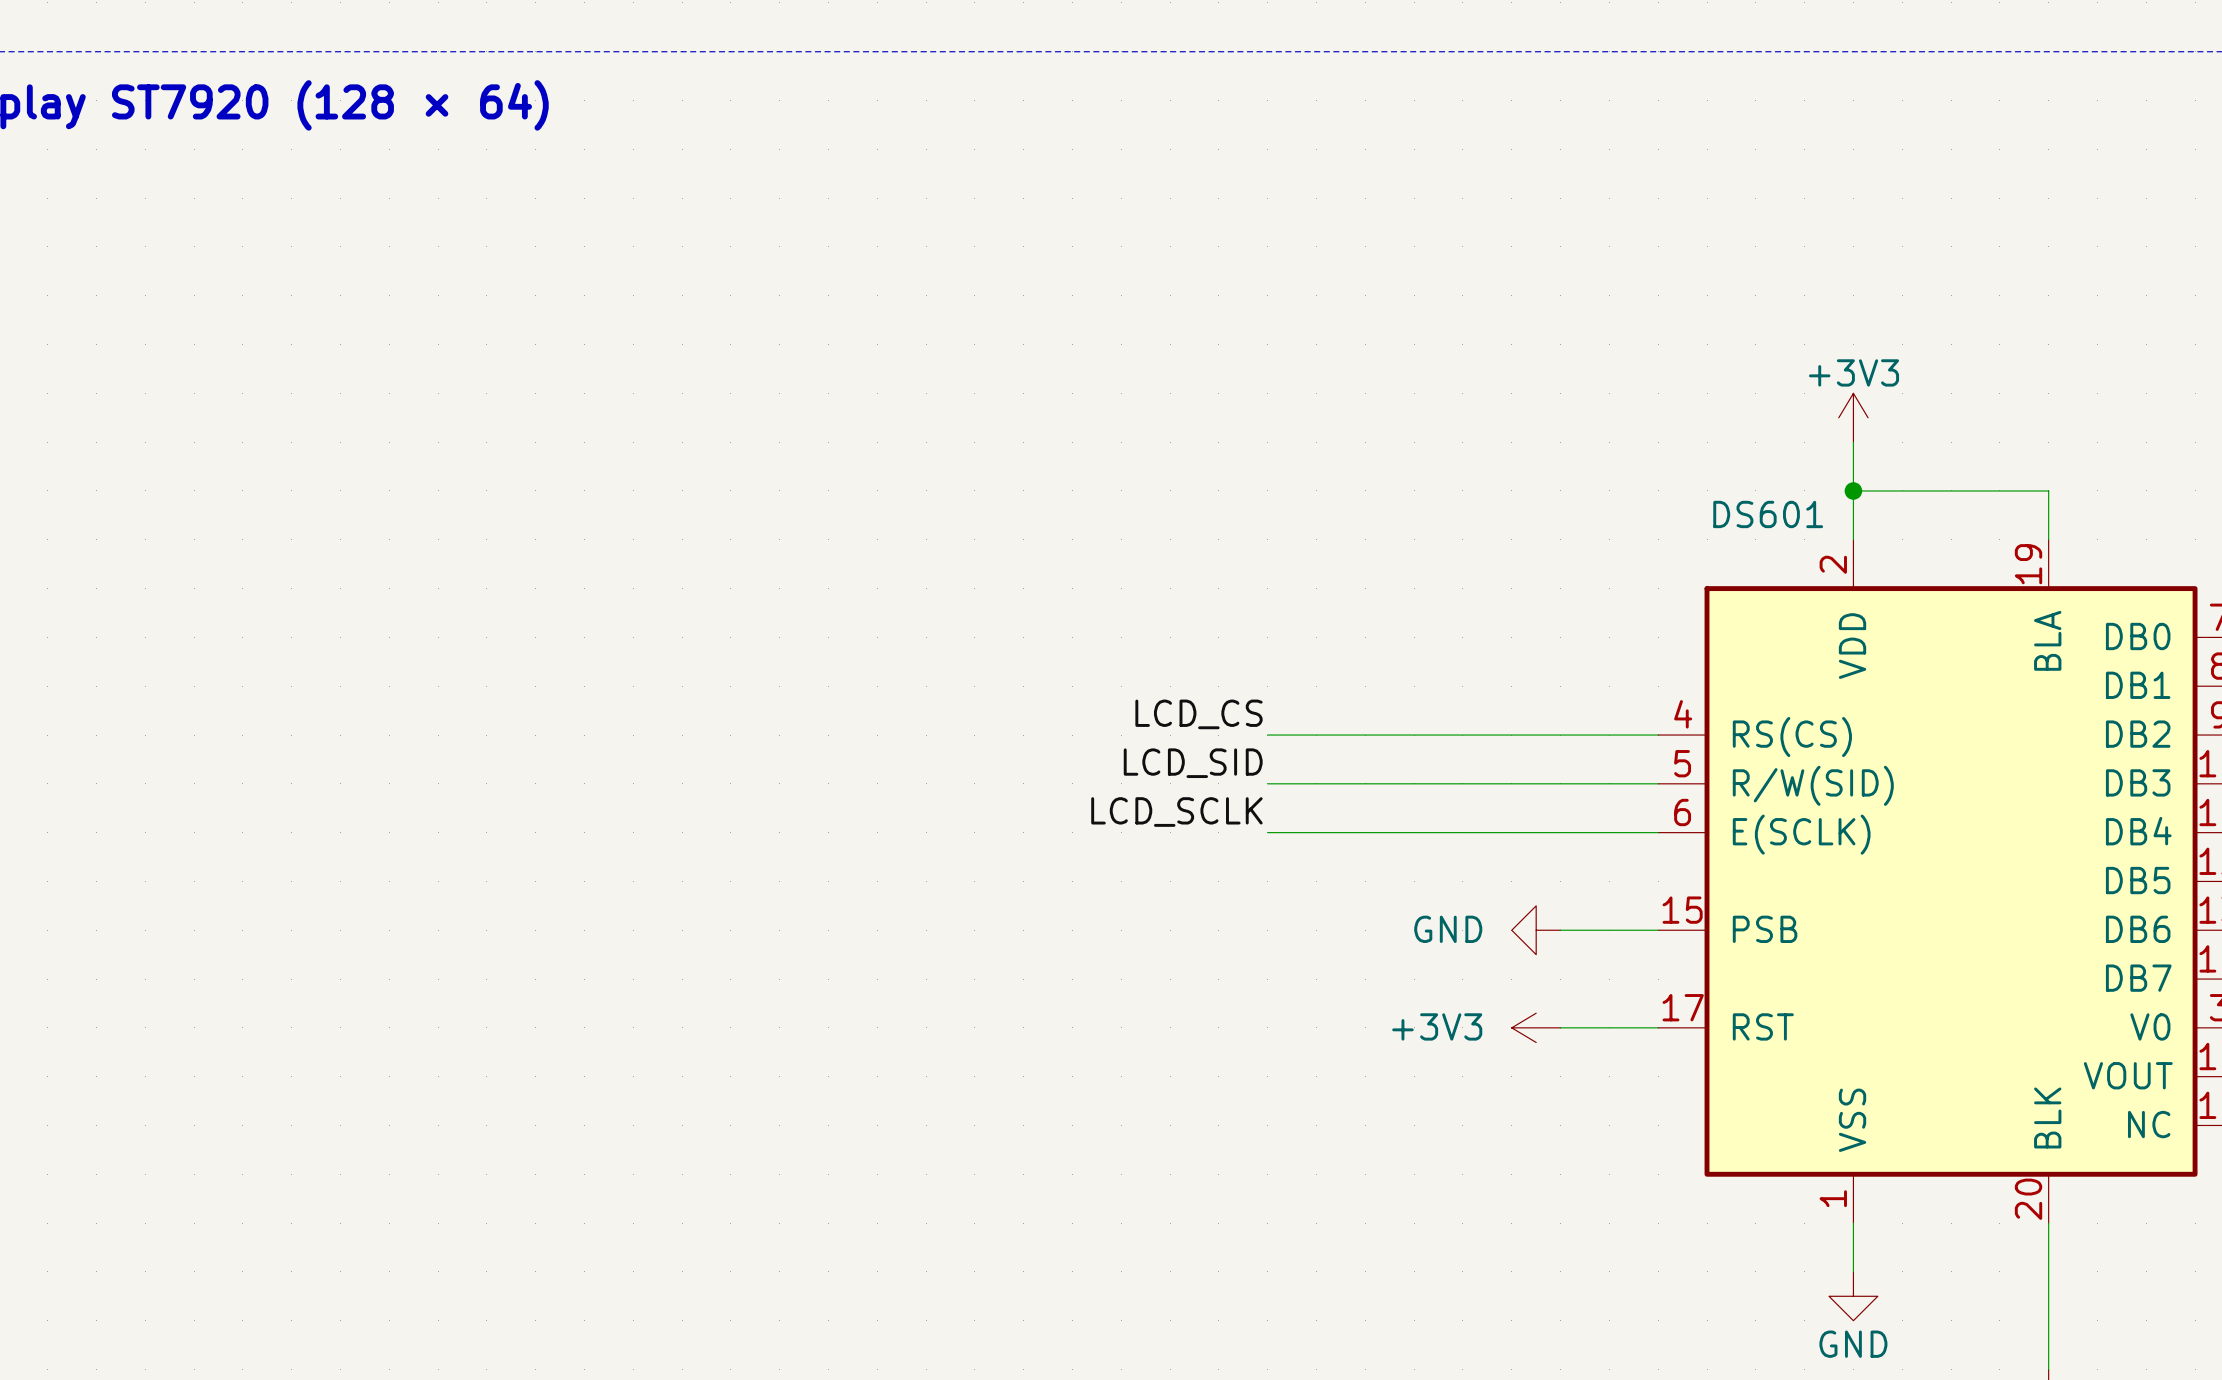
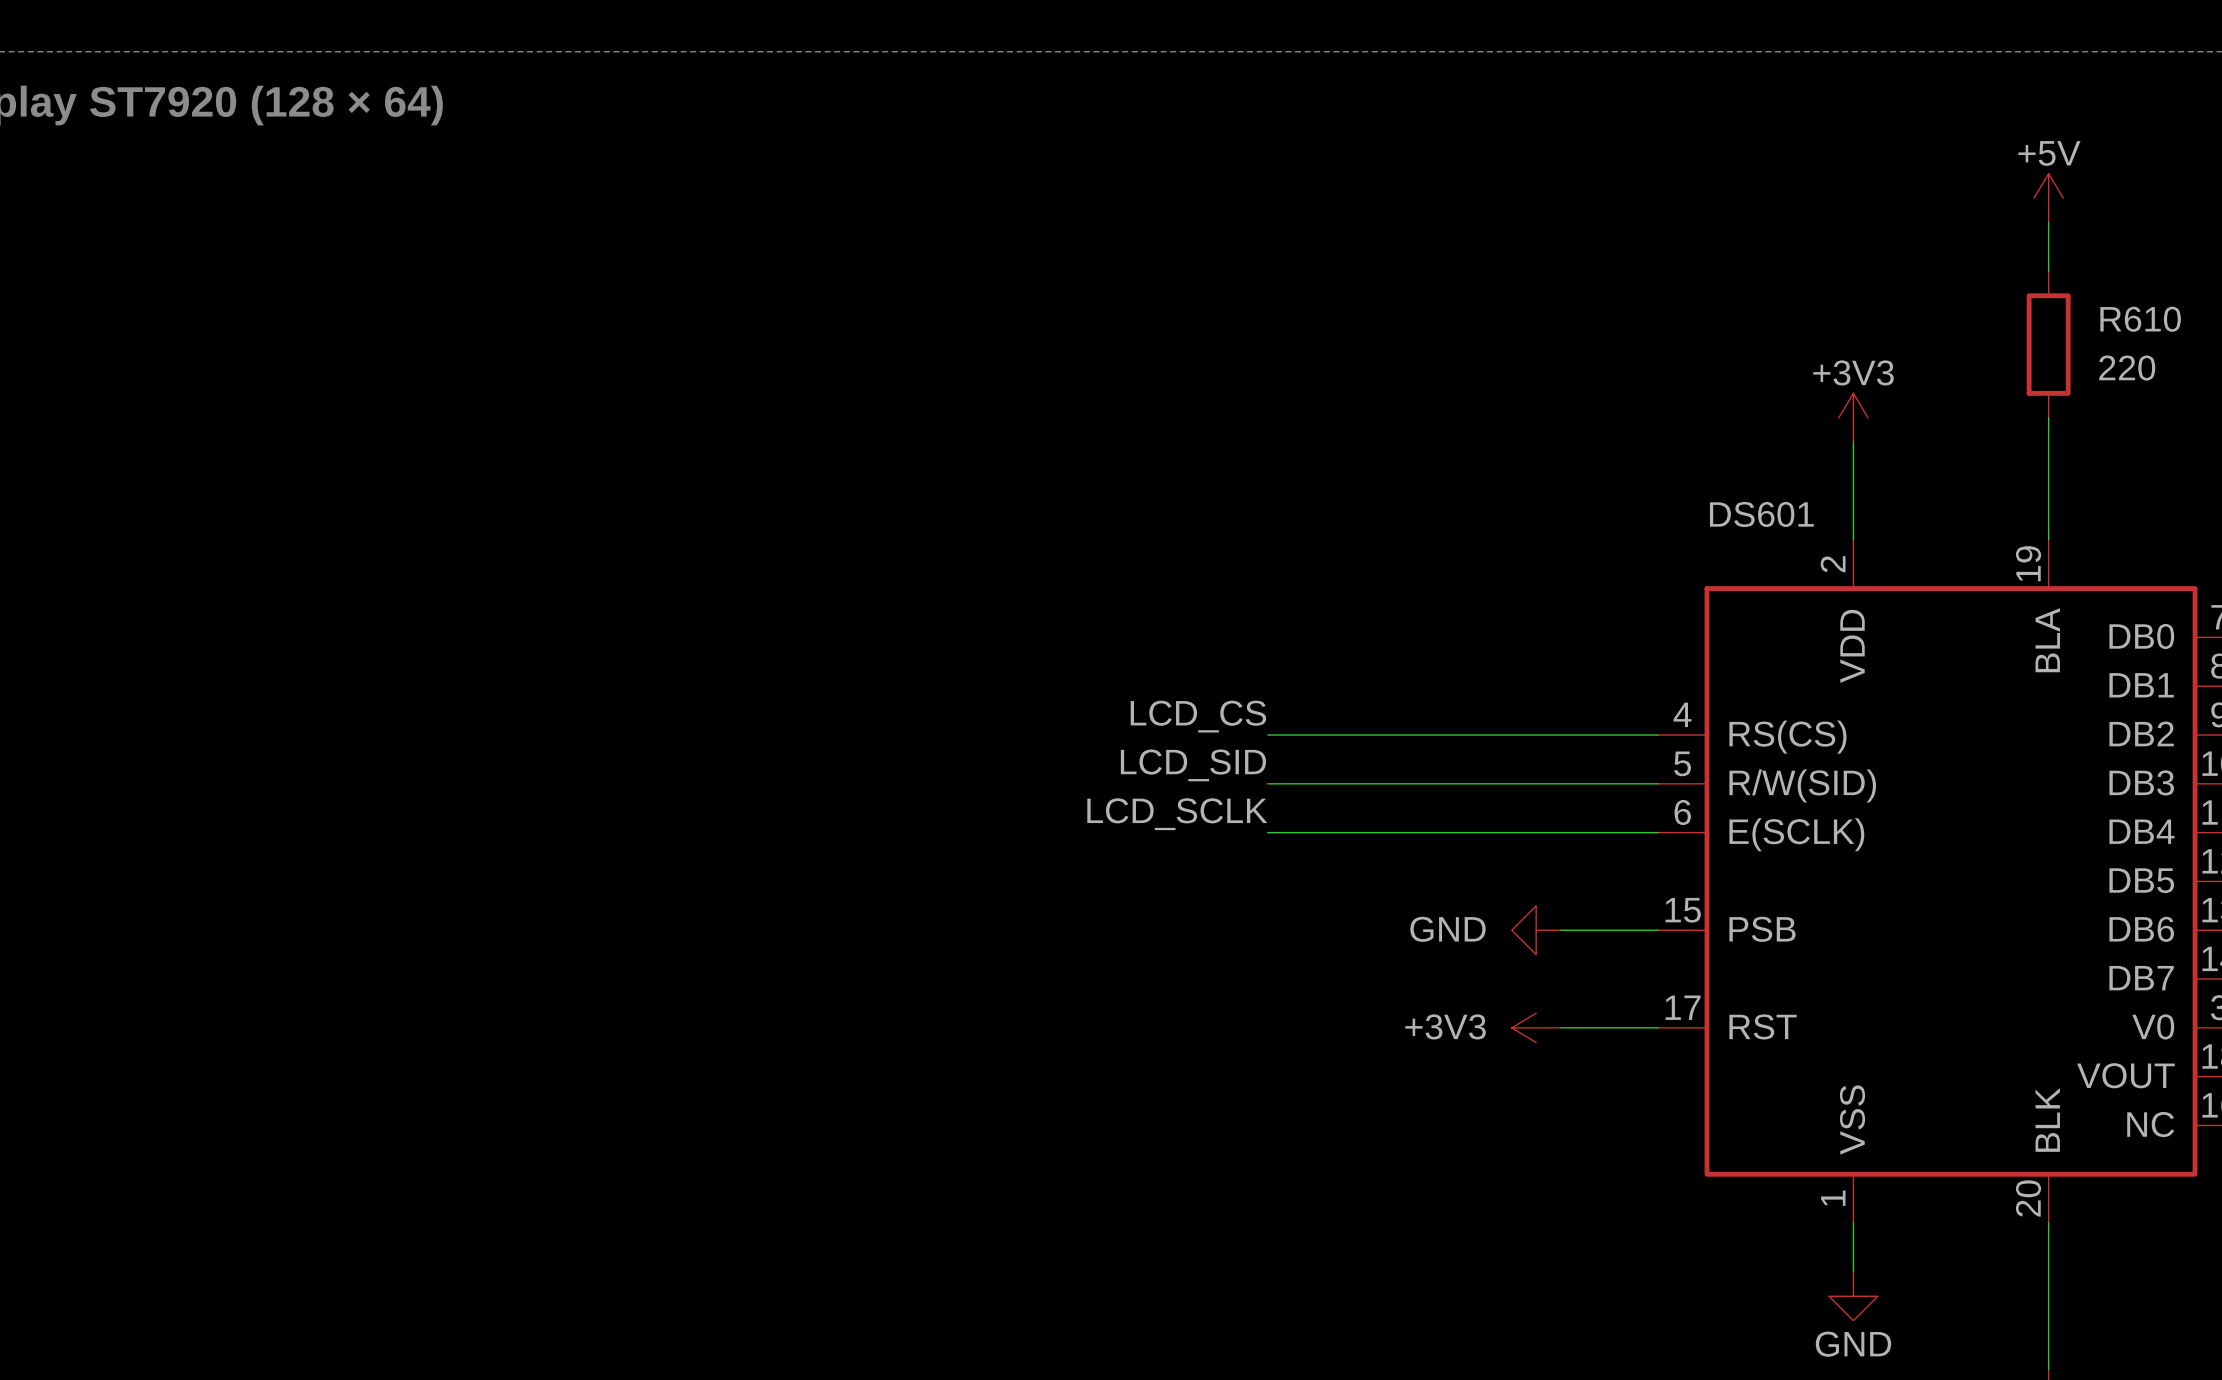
power symbol: none -> +5V (2048, 198)
wire: none -> (2048, 222) (2048, 271)
R610: none -> 220 (2048, 344)
wire: (1853, 490) (2048, 490) -> (2048, 417) (2048, 490)
junction: (1853, 490) -> none

